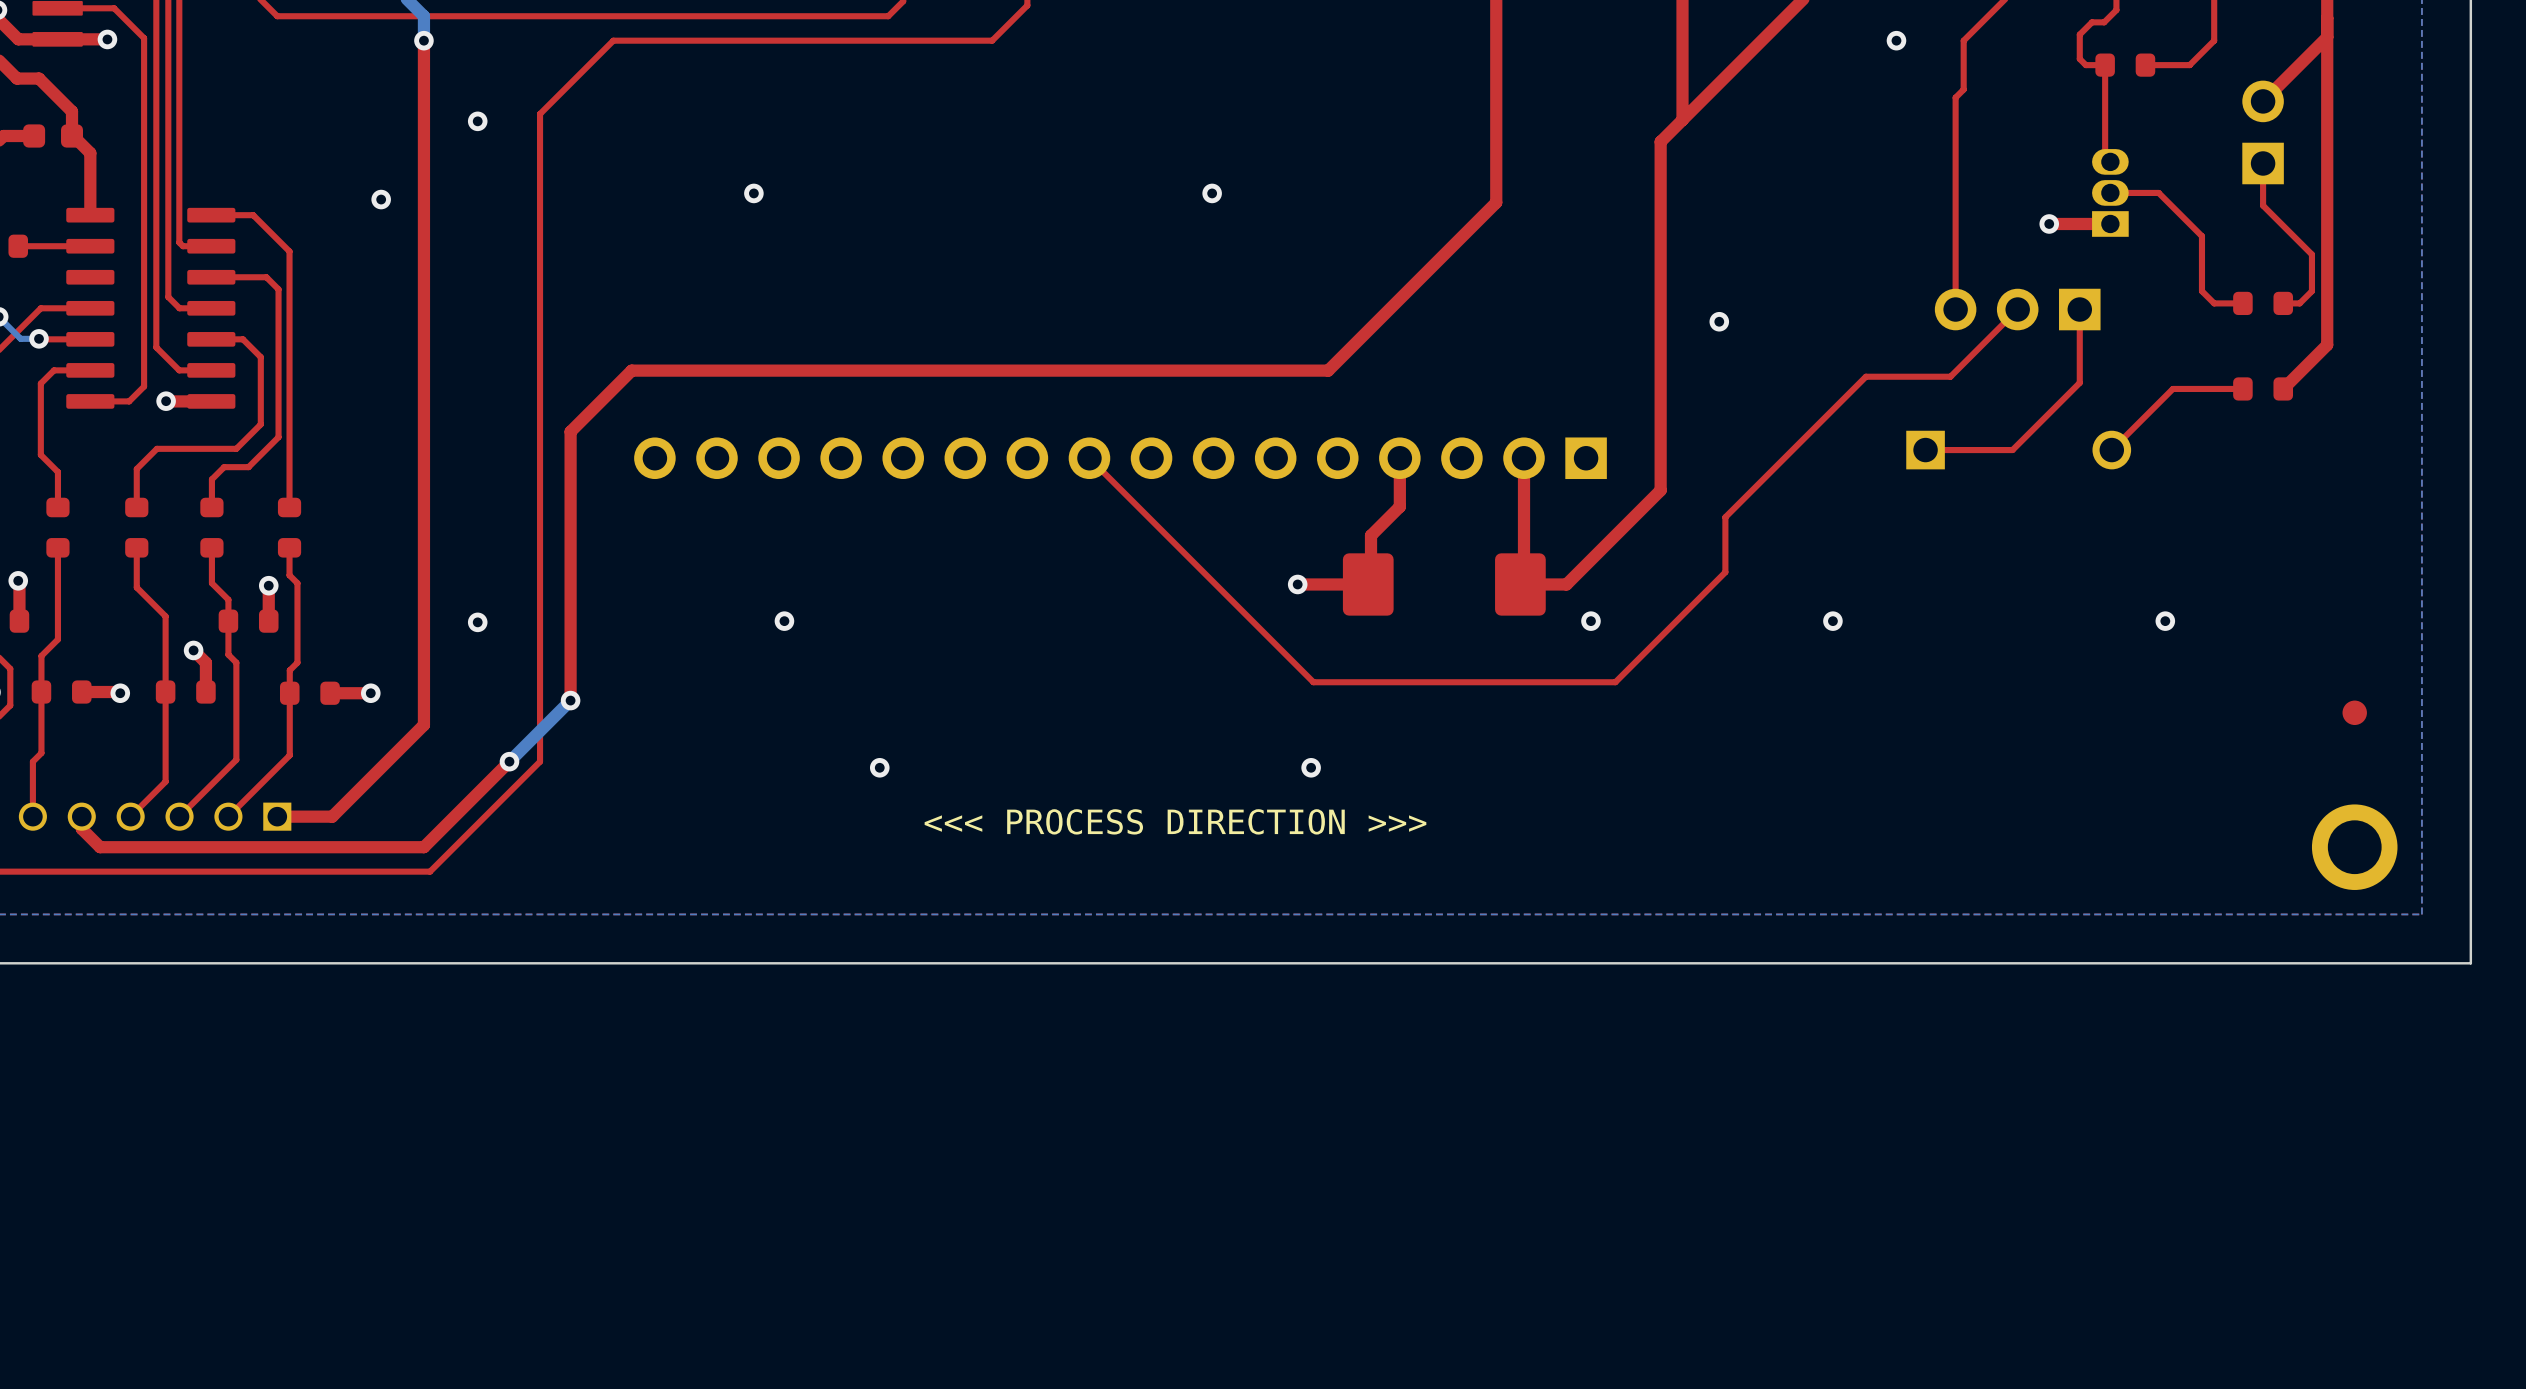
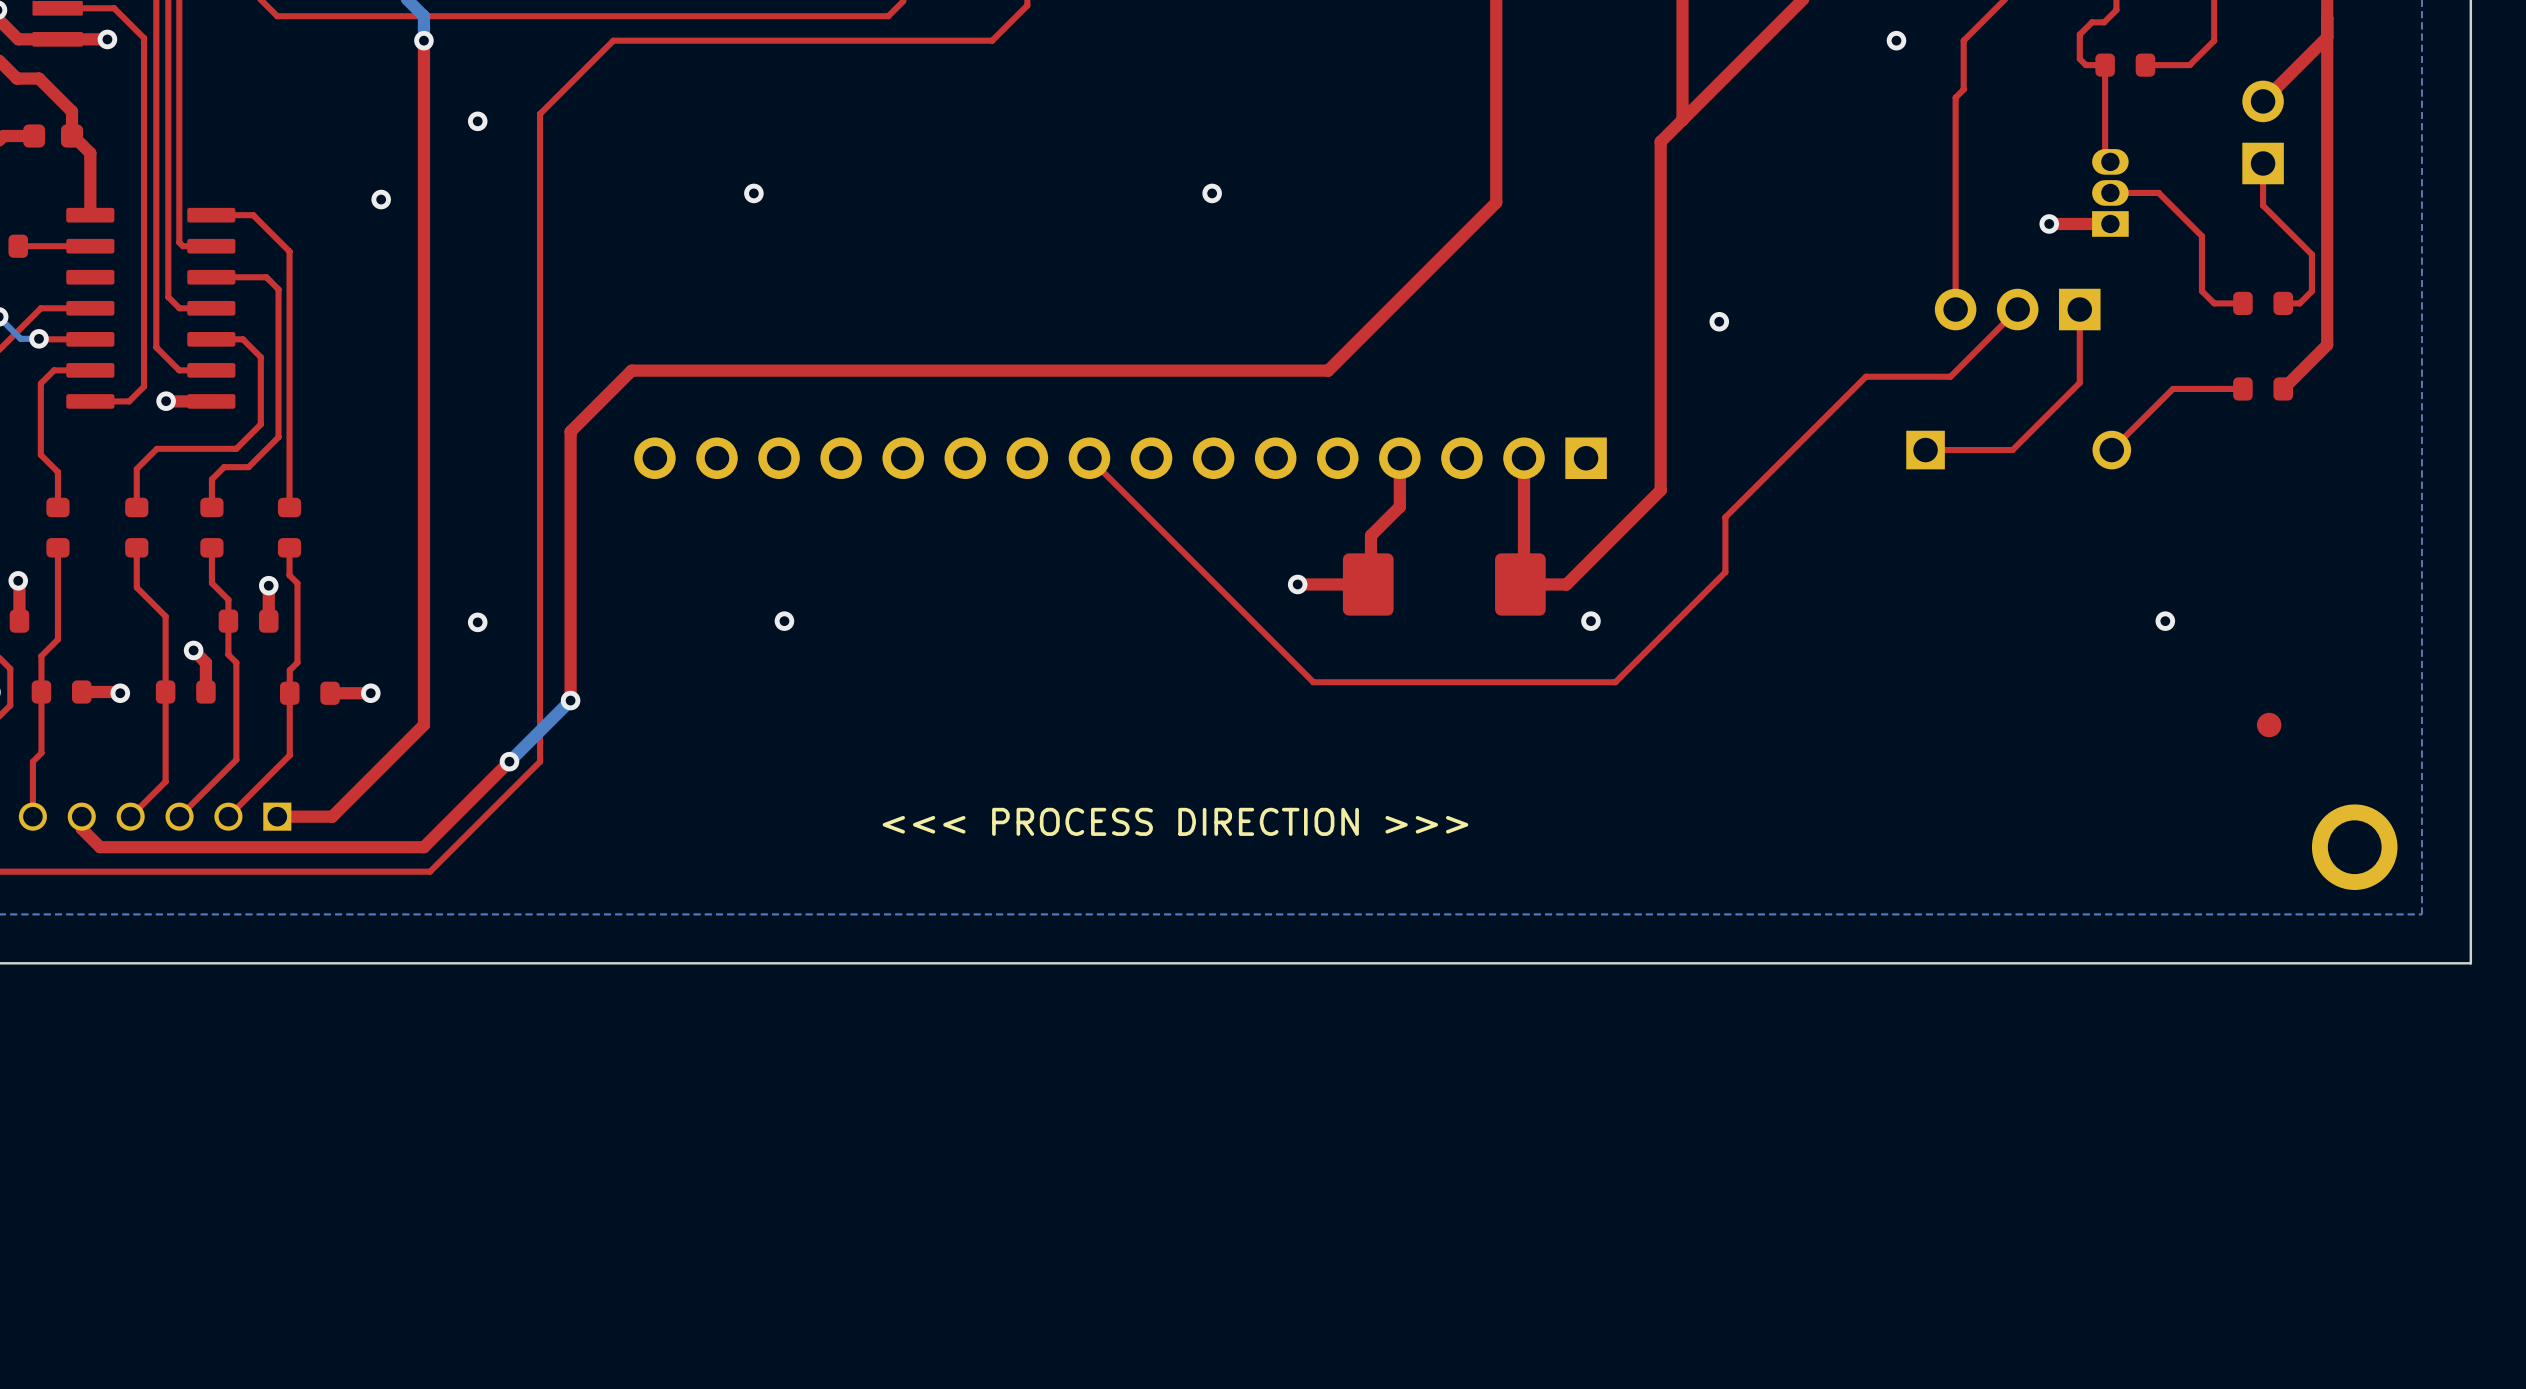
via: (1832, 621) -> none
part position: (2354, 712) -> (2269, 725)
via: (879, 767) -> none
via: (1311, 767) -> none

